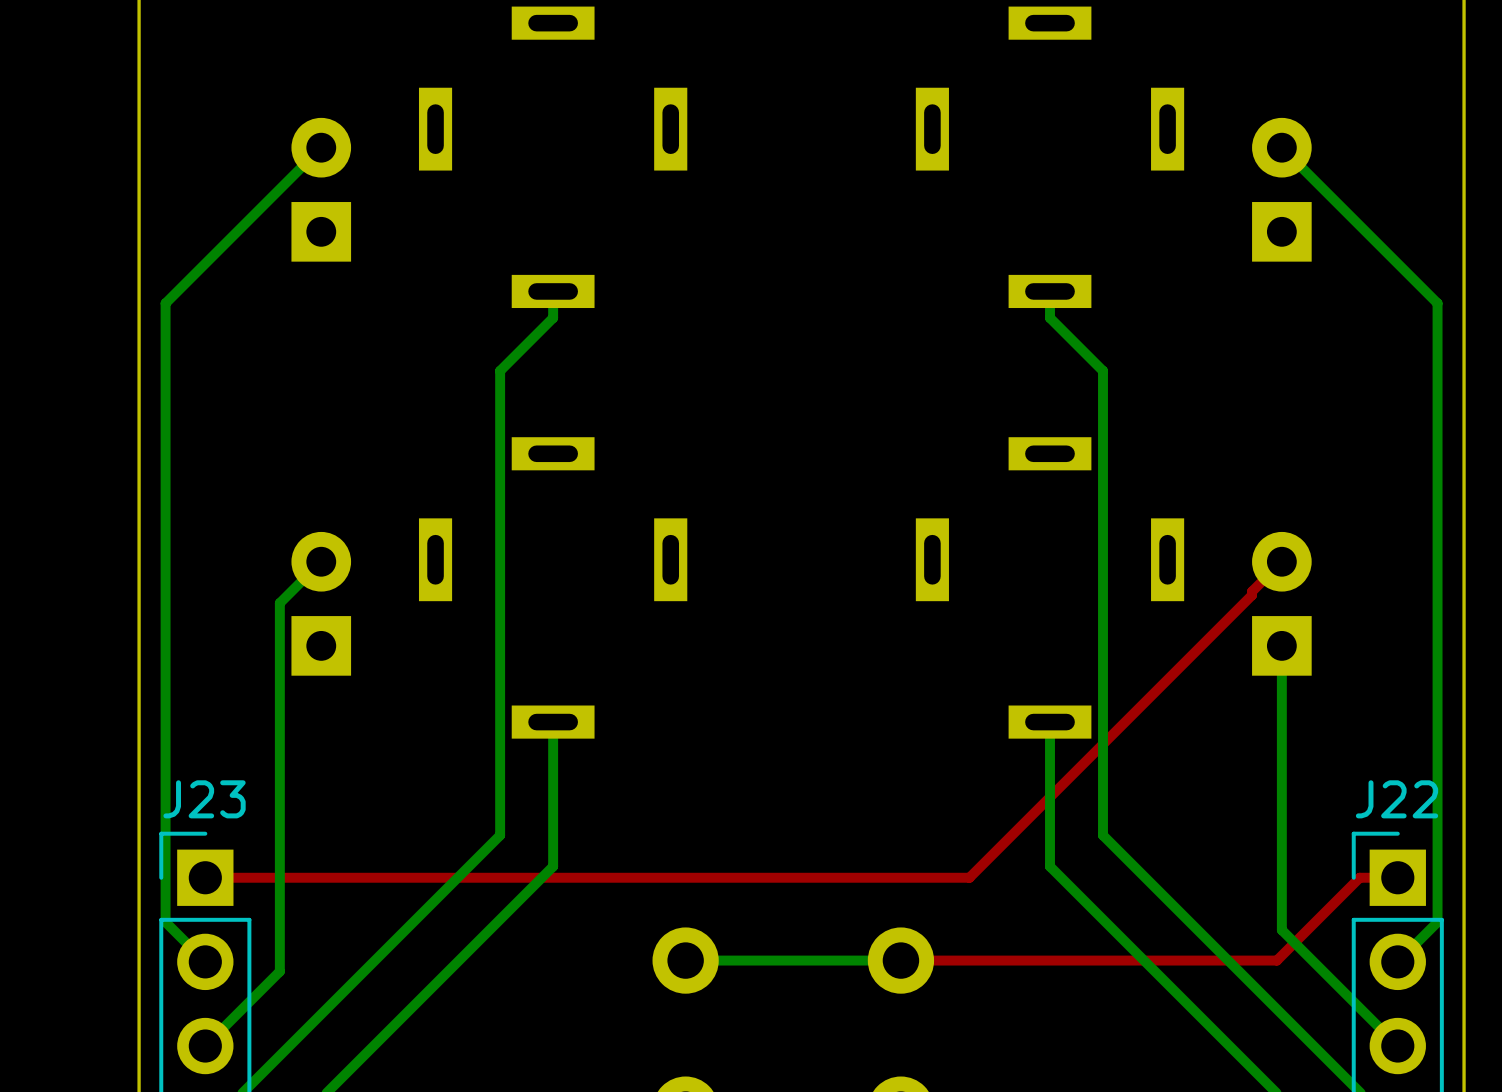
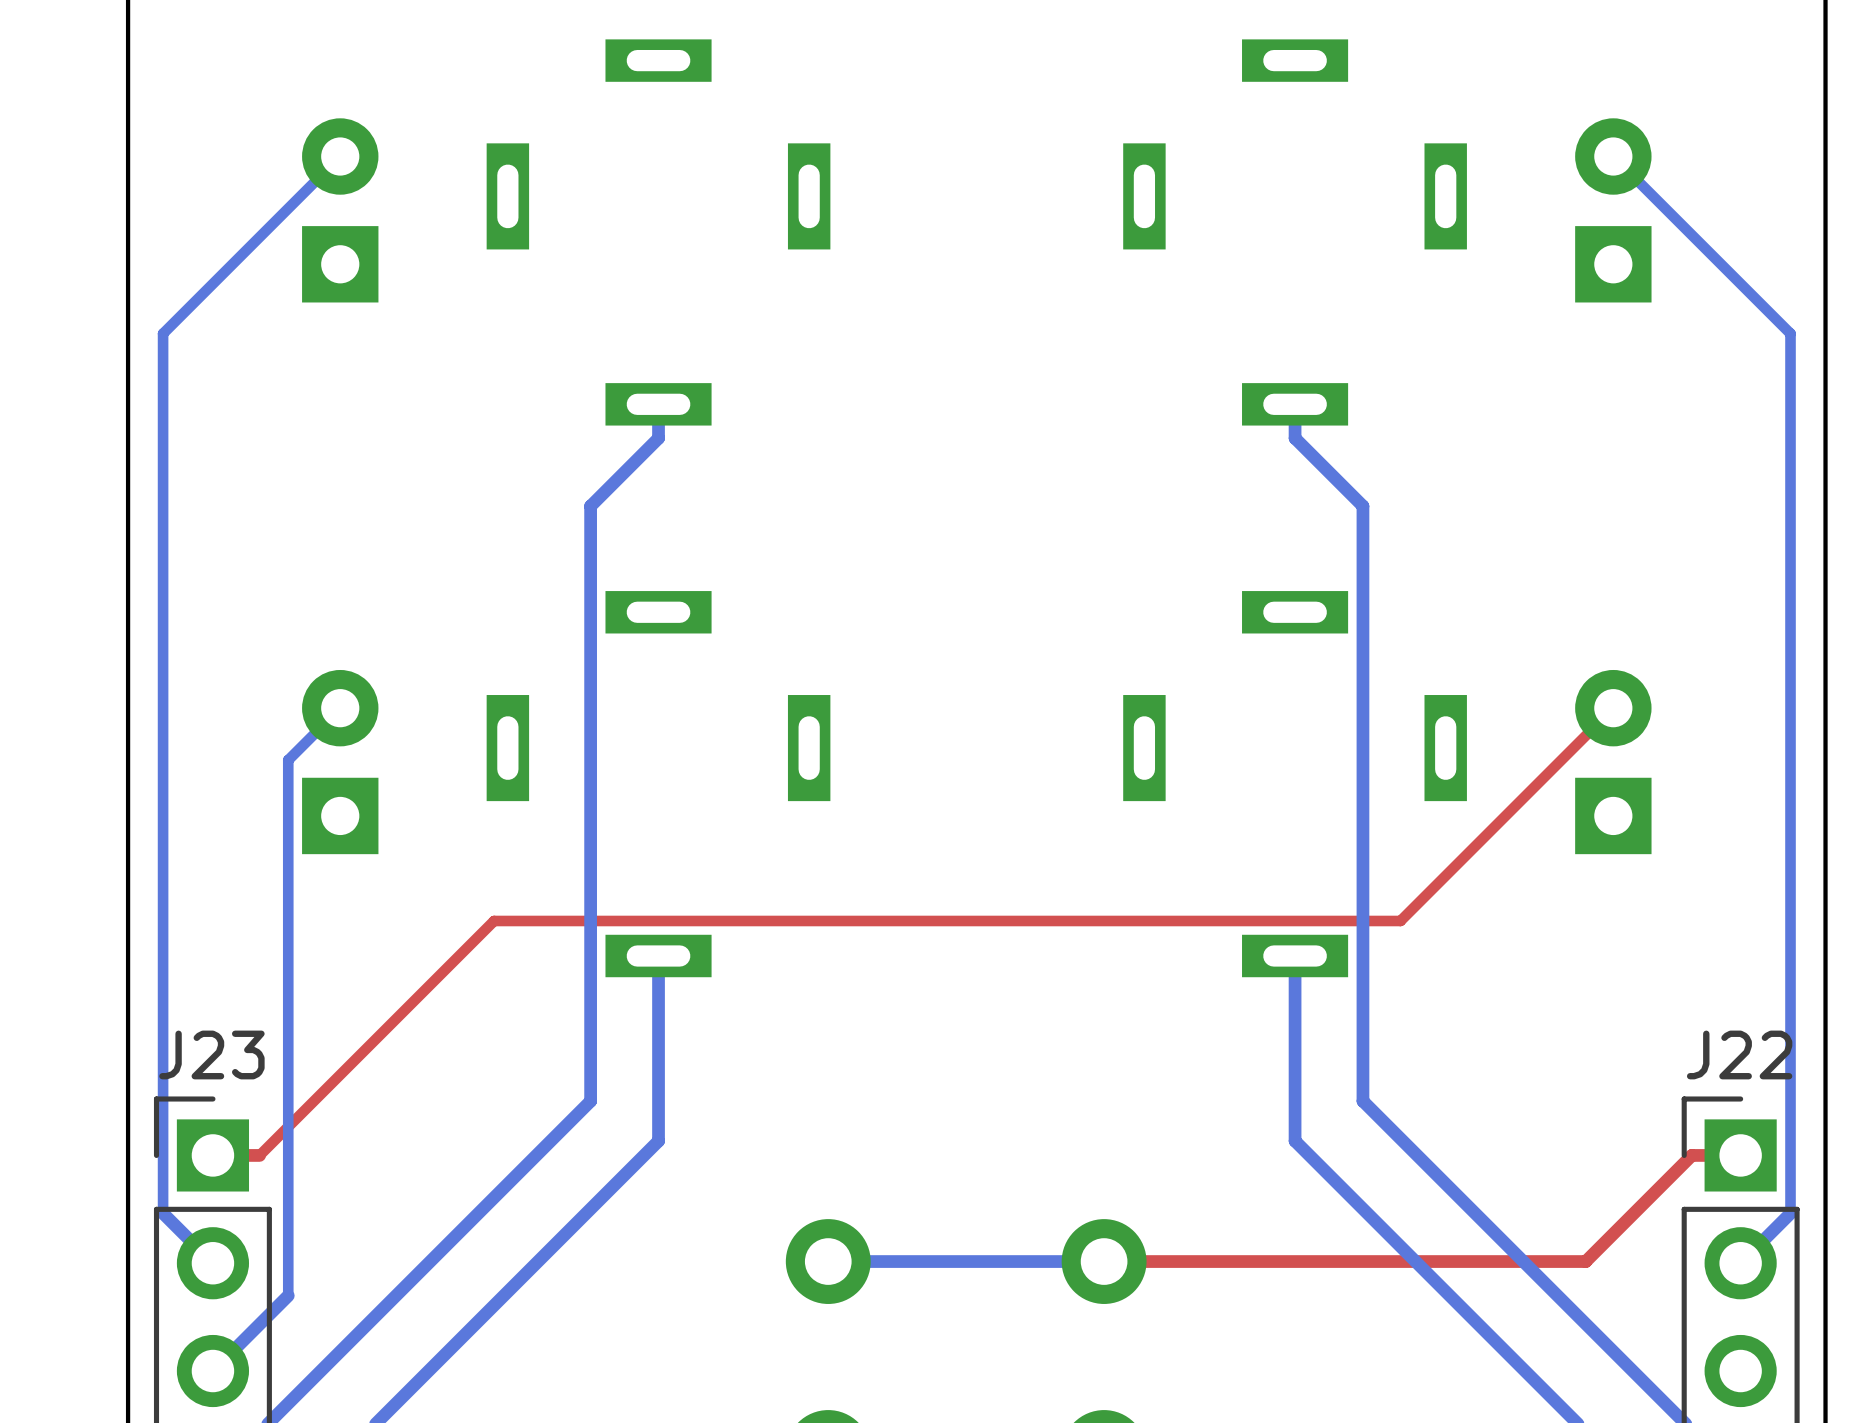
bottom track: (321, 147) (165, 303) (166, 922) -> (340, 156) (163, 333) (163, 1213)
bottom track: (1281, 147) (1437, 303) (1436, 922) -> (1613, 156) (1790, 333) (1790, 1213)
part position: (321, 189) -> (340, 210)
part position: (1281, 189) -> (1613, 210)
bottom track: (321, 561) (279, 603) (279, 971) (264, 987) -> (340, 708) (288, 760) (288, 1295)
top track: (1281, 561) (1252, 591) (1252, 595) (969, 877) (241, 877) -> (1613, 708) (1400, 920) (494, 920) (259, 1155)
part position: (321, 603) -> (340, 762)
part position: (1281, 603) -> (1613, 762)
bottom track: (1281, 645) (1281, 930) (1397, 1046) -> none

